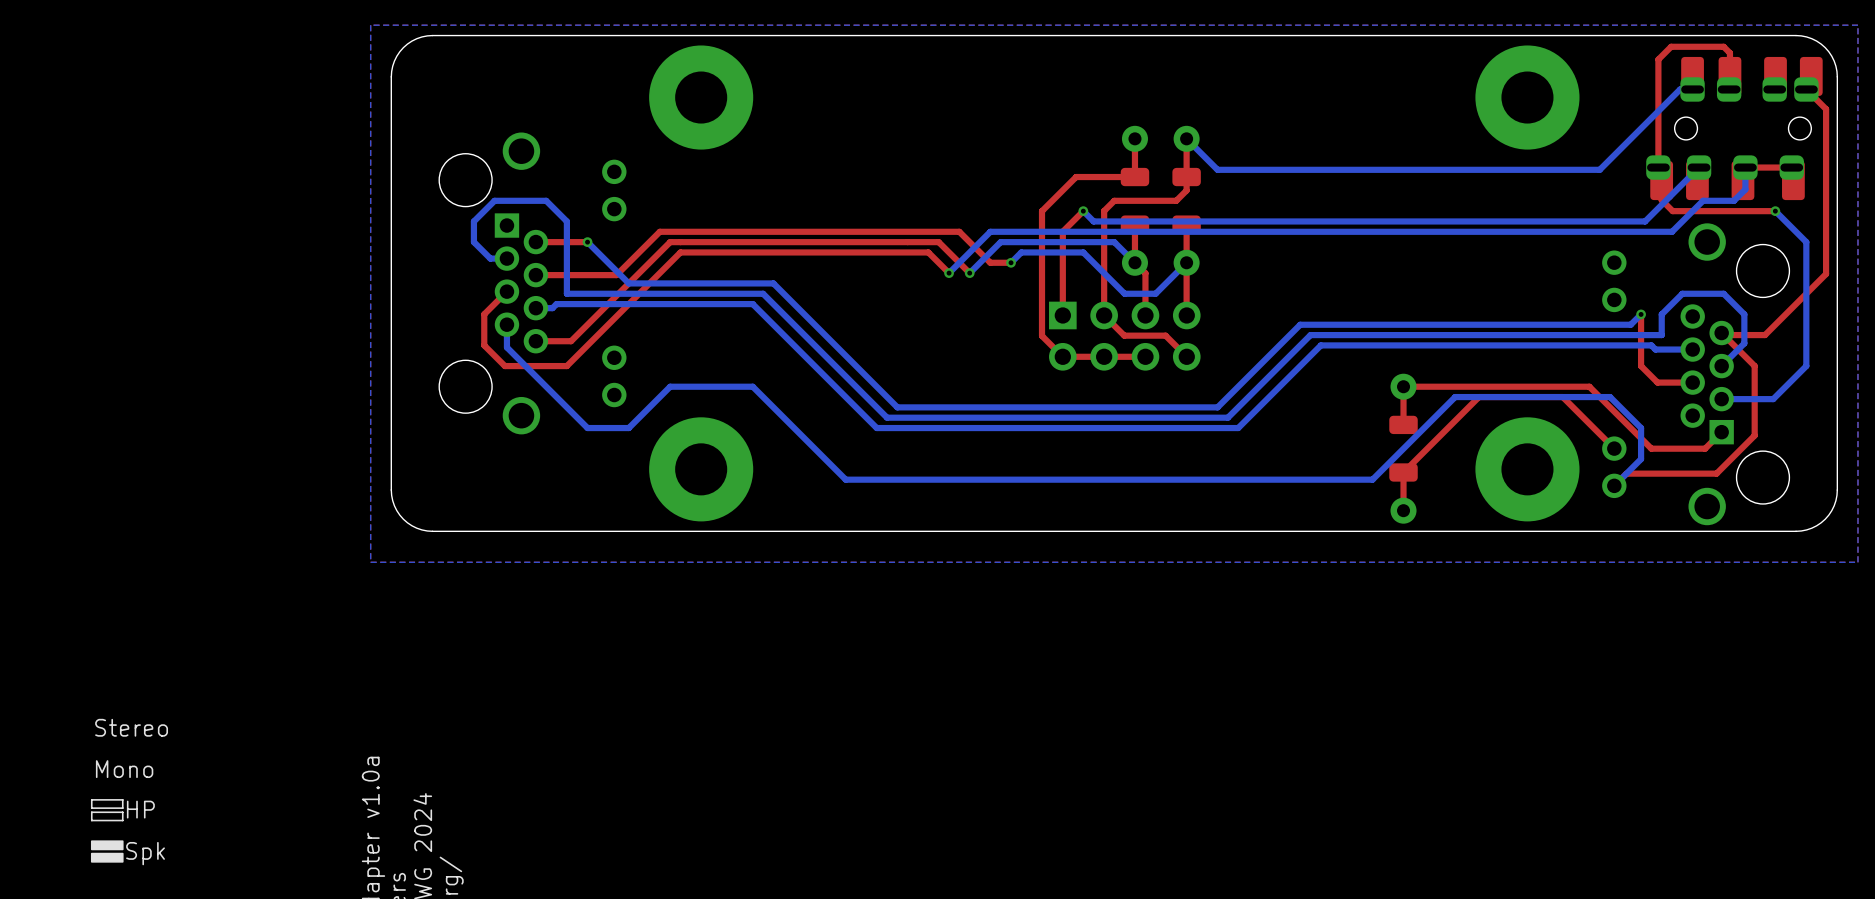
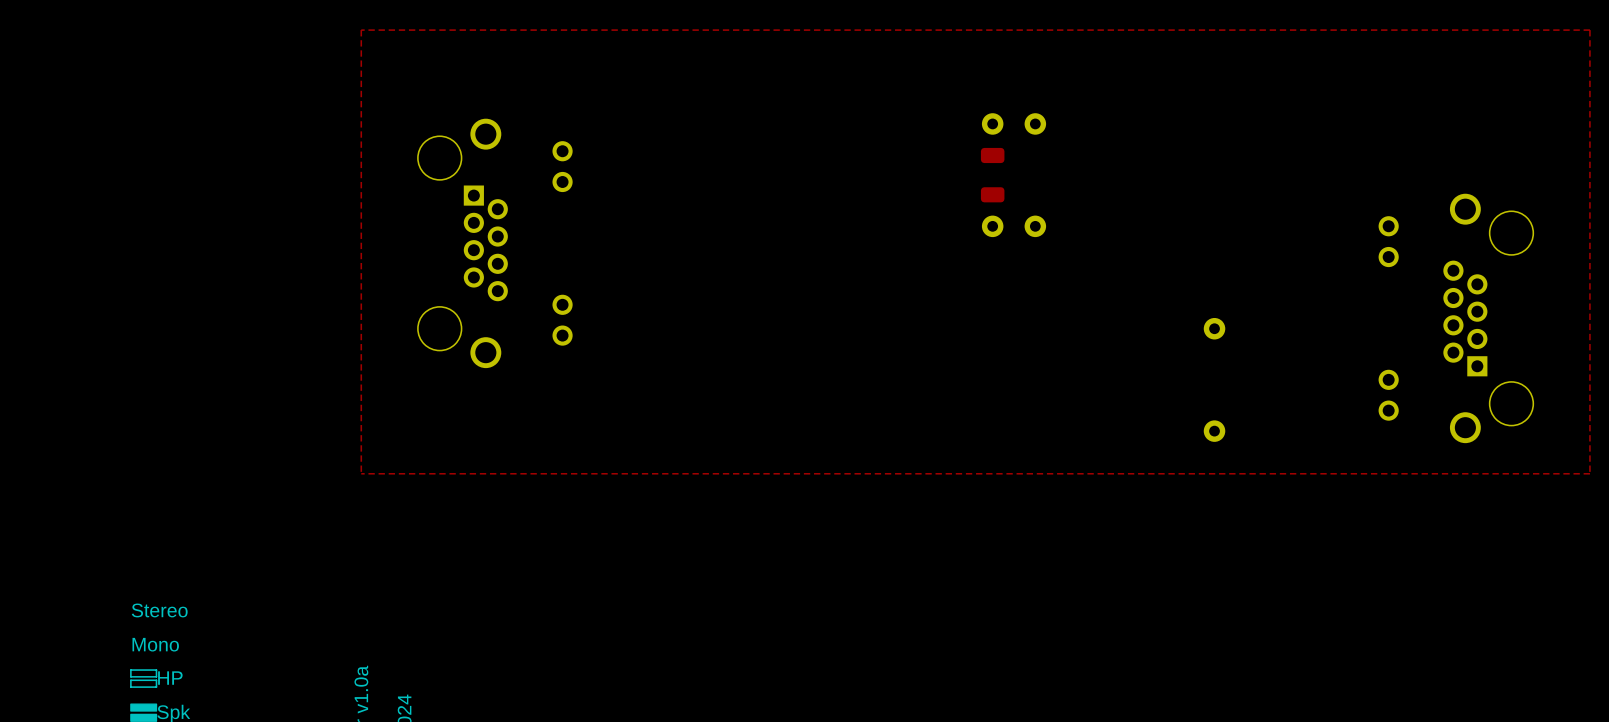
bottom zone outline: (1857, 25) (370, 25) (370, 562) (1857, 562) (1857, 25) -> none
board edge: (1796, 35) (421, 36) (407, 44) (399, 51) (392, 66) (391, 76) (392, 500) (399, 515) (407, 522) (421, 529) (432, 531) (1806, 529) (1825, 519) (1834, 505) (1836, 495) (1837, 76) (1834, 61) (1825, 47) (1811, 38) (1796, 35) -> none
top track: (1811, 76) (1806, 81) (1806, 89) (1826, 109) (1826, 274) (1765, 335) (1723, 335) -> none
bottom track: (1692, 89) (1680, 89) (1599, 169) (1217, 169) (1186, 138) -> none
top track: (1729, 89) (1729, 53) (1723, 46) (1671, 46) (1658, 59) (1658, 177) (1661, 180) (1661, 200) (1672, 211) (1775, 211) -> none
part: (701, 97) -> none
part: (1527, 97) -> none
part: (1734, 128) -> none
top track: (1134, 138) (1134, 177) (1076, 177) (1042, 211) (1042, 335) (1062, 356) (1145, 356) -> none
top track: (1186, 138) (1186, 190) (1176, 200) (1114, 200) (1104, 210) (1104, 315) (1124, 335) (1165, 335) (1186, 356) -> none
bottom track: (1699, 167) (1645, 221) (1093, 221) (1083, 211) -> none
bottom track: (1745, 167) (1745, 189) (1734, 200) (1703, 200) (1672, 231) (990, 231) (949, 273) -> none
top track: (1791, 167) (1745, 167) -> none
part: (1186, 200) -> none
top track: (1083, 211) (1062, 231) (1062, 315) -> none
via: (1083, 211) -> none
bottom track: (1775, 211) (1806, 242) (1806, 366) (1773, 399) (1721, 399) -> none
via: (1775, 211) -> none
top track: (1134, 224) (1134, 262) (1145, 273) (1145, 315) -> none
top track: (1186, 224) (1186, 315) -> none
bottom track: (587, 242) (628, 283) (773, 283) (897, 407) (1217, 407) (1300, 324) (1630, 324) (1641, 314) -> none
top track: (587, 242) (535, 242) -> none
via: (587, 242) -> none
bottom track: (506, 258) (490, 258) (473, 242) (473, 221) (494, 200) (546, 200) (566, 221) (566, 293) (763, 293) (887, 417) (1227, 417) (1310, 335) (1661, 335) (1661, 314) (1682, 293) (1723, 293) (1744, 314) (1744, 343) (1721, 366) -> none
top track: (1011, 262) (990, 262) (959, 231) (659, 231) (616, 275) (535, 275) -> none
via: (1011, 262) -> none
bottom track: (1134, 262) (1114, 242) (1000, 242) (969, 273) -> none
bottom track: (1186, 262) (1155, 293) (1124, 293) (1083, 252) (1021, 252) (1011, 262) -> none
top track: (949, 273) (928, 252) (680, 252) (566, 366) (504, 366) (484, 345) (484, 314) (506, 291) -> none
via: (949, 273) -> none
top track: (969, 273) (938, 242) (670, 242) (571, 341) (535, 341) -> none
via: (969, 273) -> none
bottom track: (535, 308) (552, 308) (556, 304) (752, 304) (876, 428) (1238, 428) (1320, 345) (1651, 345) (1655, 349) (1692, 349) -> none
top track: (1641, 314) (1641, 366) (1657, 382) (1692, 382) -> none
via: (1641, 314) -> none
bottom track: (506, 324) (506, 347) (587, 428) (628, 428) (670, 386) (752, 386) (845, 479) (1372, 479) (1455, 397) (1610, 397) (1641, 428) (1641, 459) (1614, 485) -> none
top track: (1721, 333) (1754, 366) (1754, 435) (1716, 473) (1626, 473) (1614, 485) -> none
part: (1124, 336) -> none
top track: (1403, 424) (1403, 386) (1589, 386) (1651, 448) (1705, 448) (1721, 432) -> none
part: (1403, 448) -> none
top track: (1614, 448) (1562, 397) (1478, 397) (1403, 472) (1403, 510) -> none
part: (701, 469) -> none
part: (1527, 469) -> none

